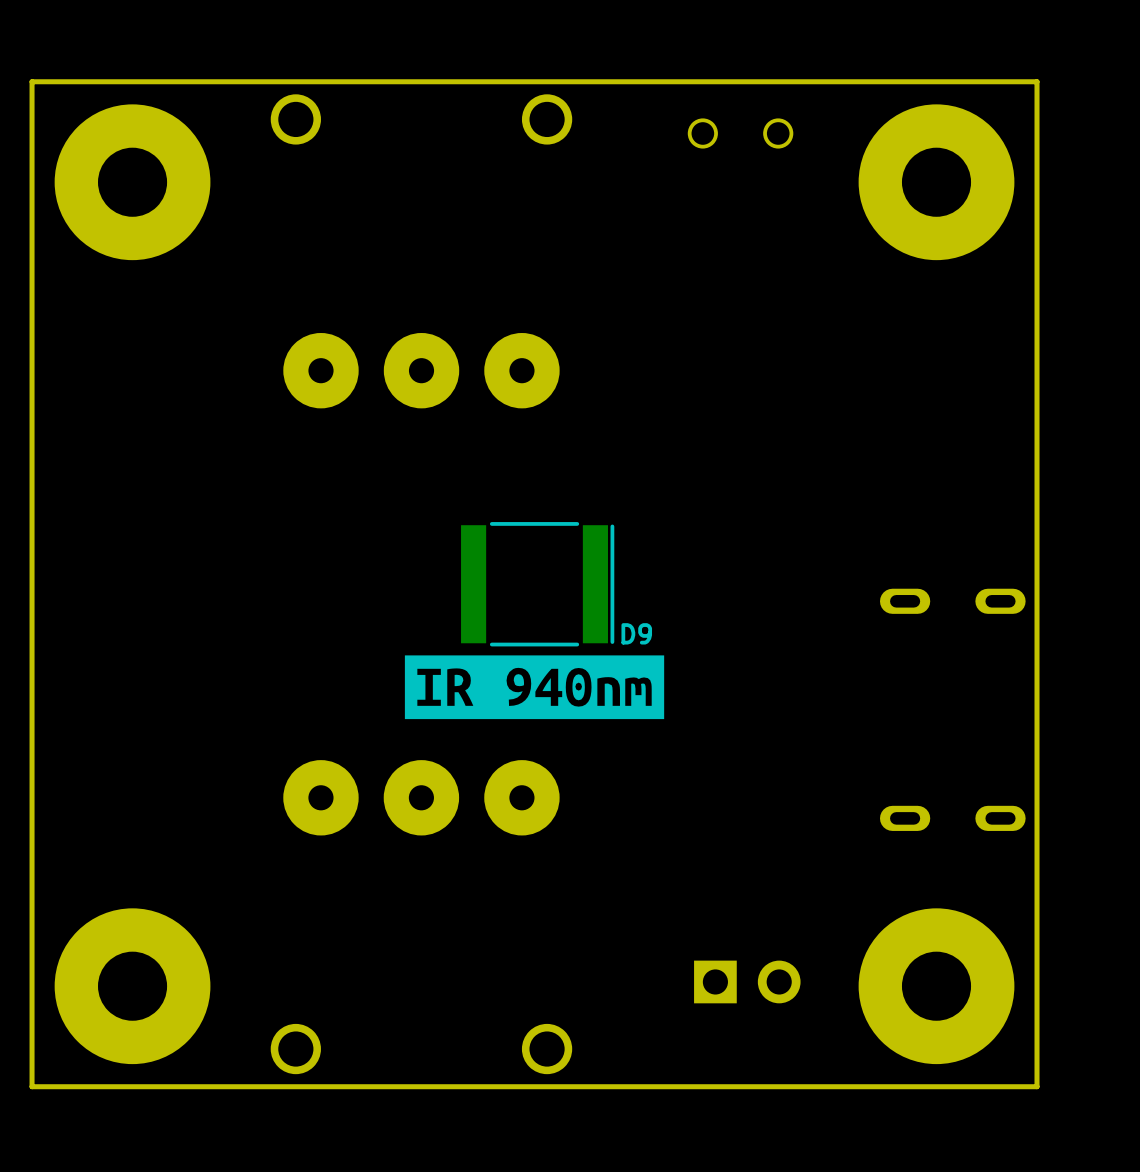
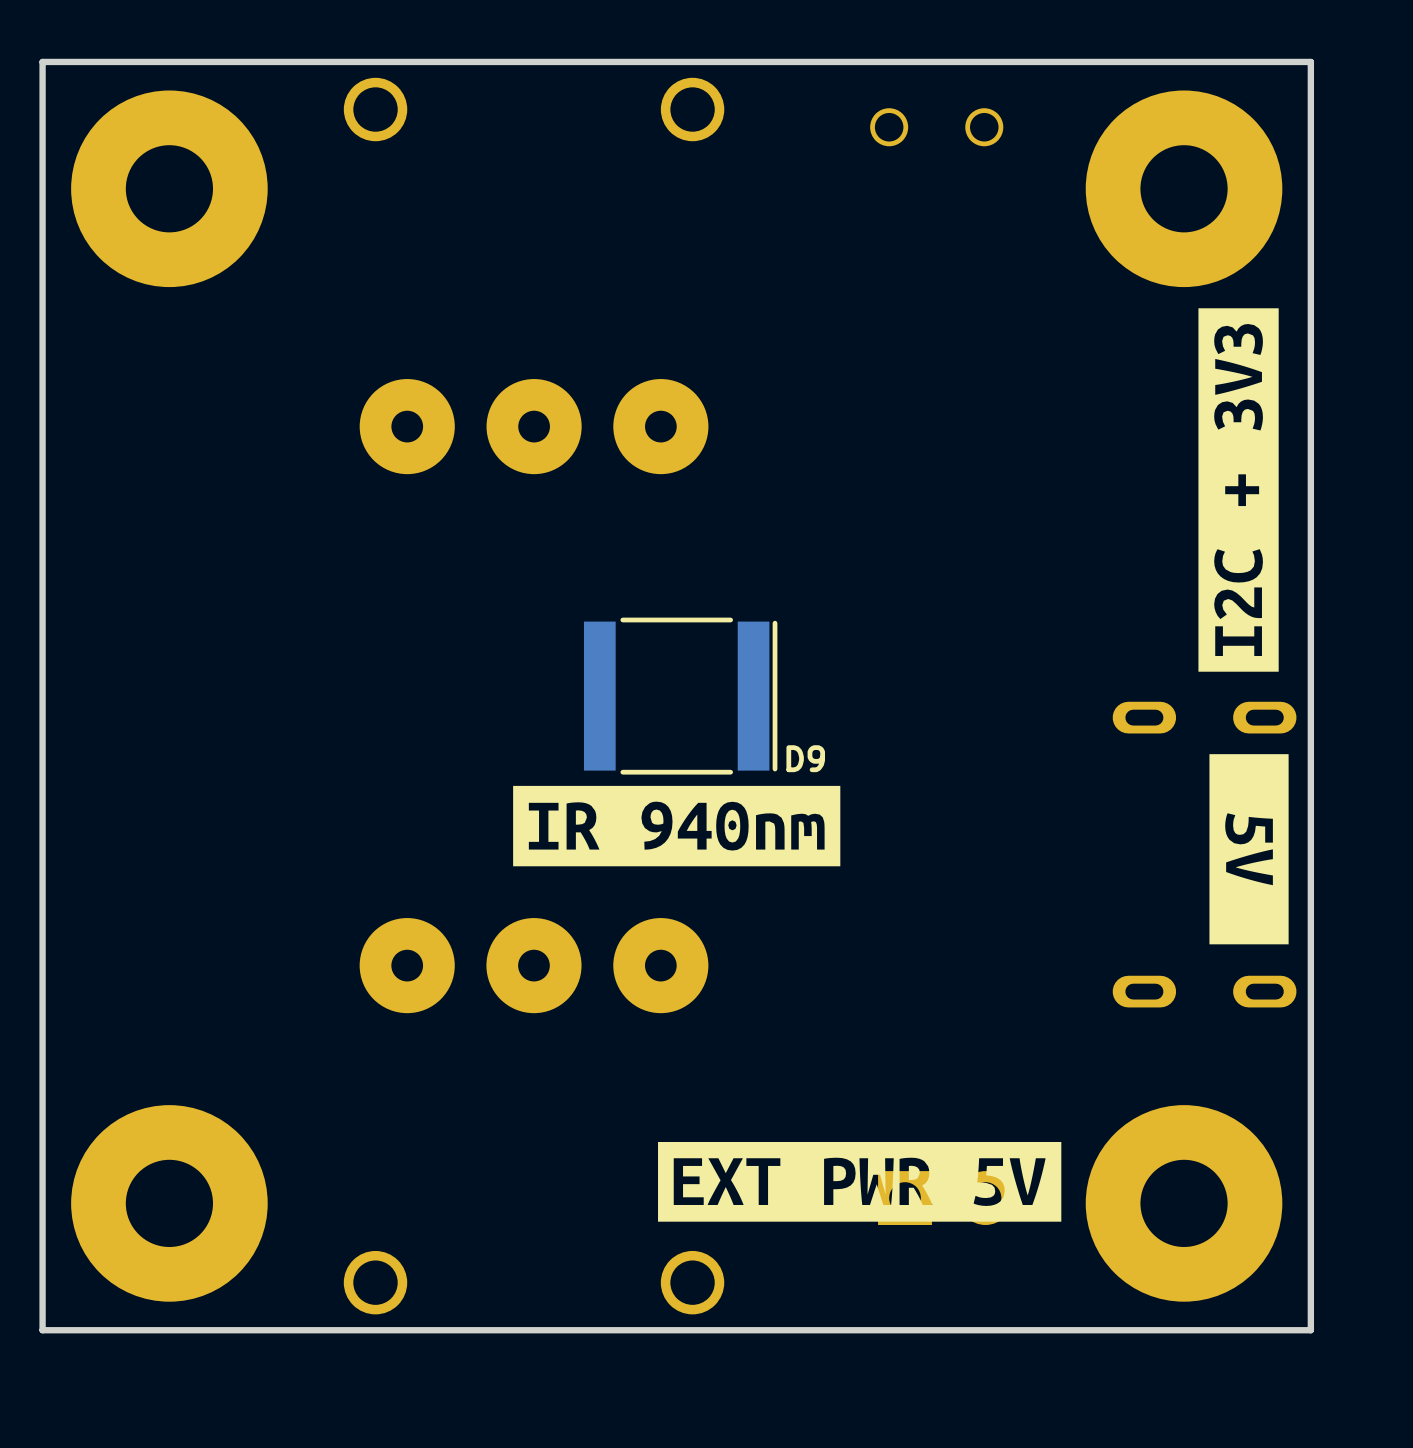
drawing: none -> [1198, 308, 1279, 672]
drawing: none -> [1209, 754, 1289, 945]
drawing: none -> [658, 1141, 1062, 1222]

